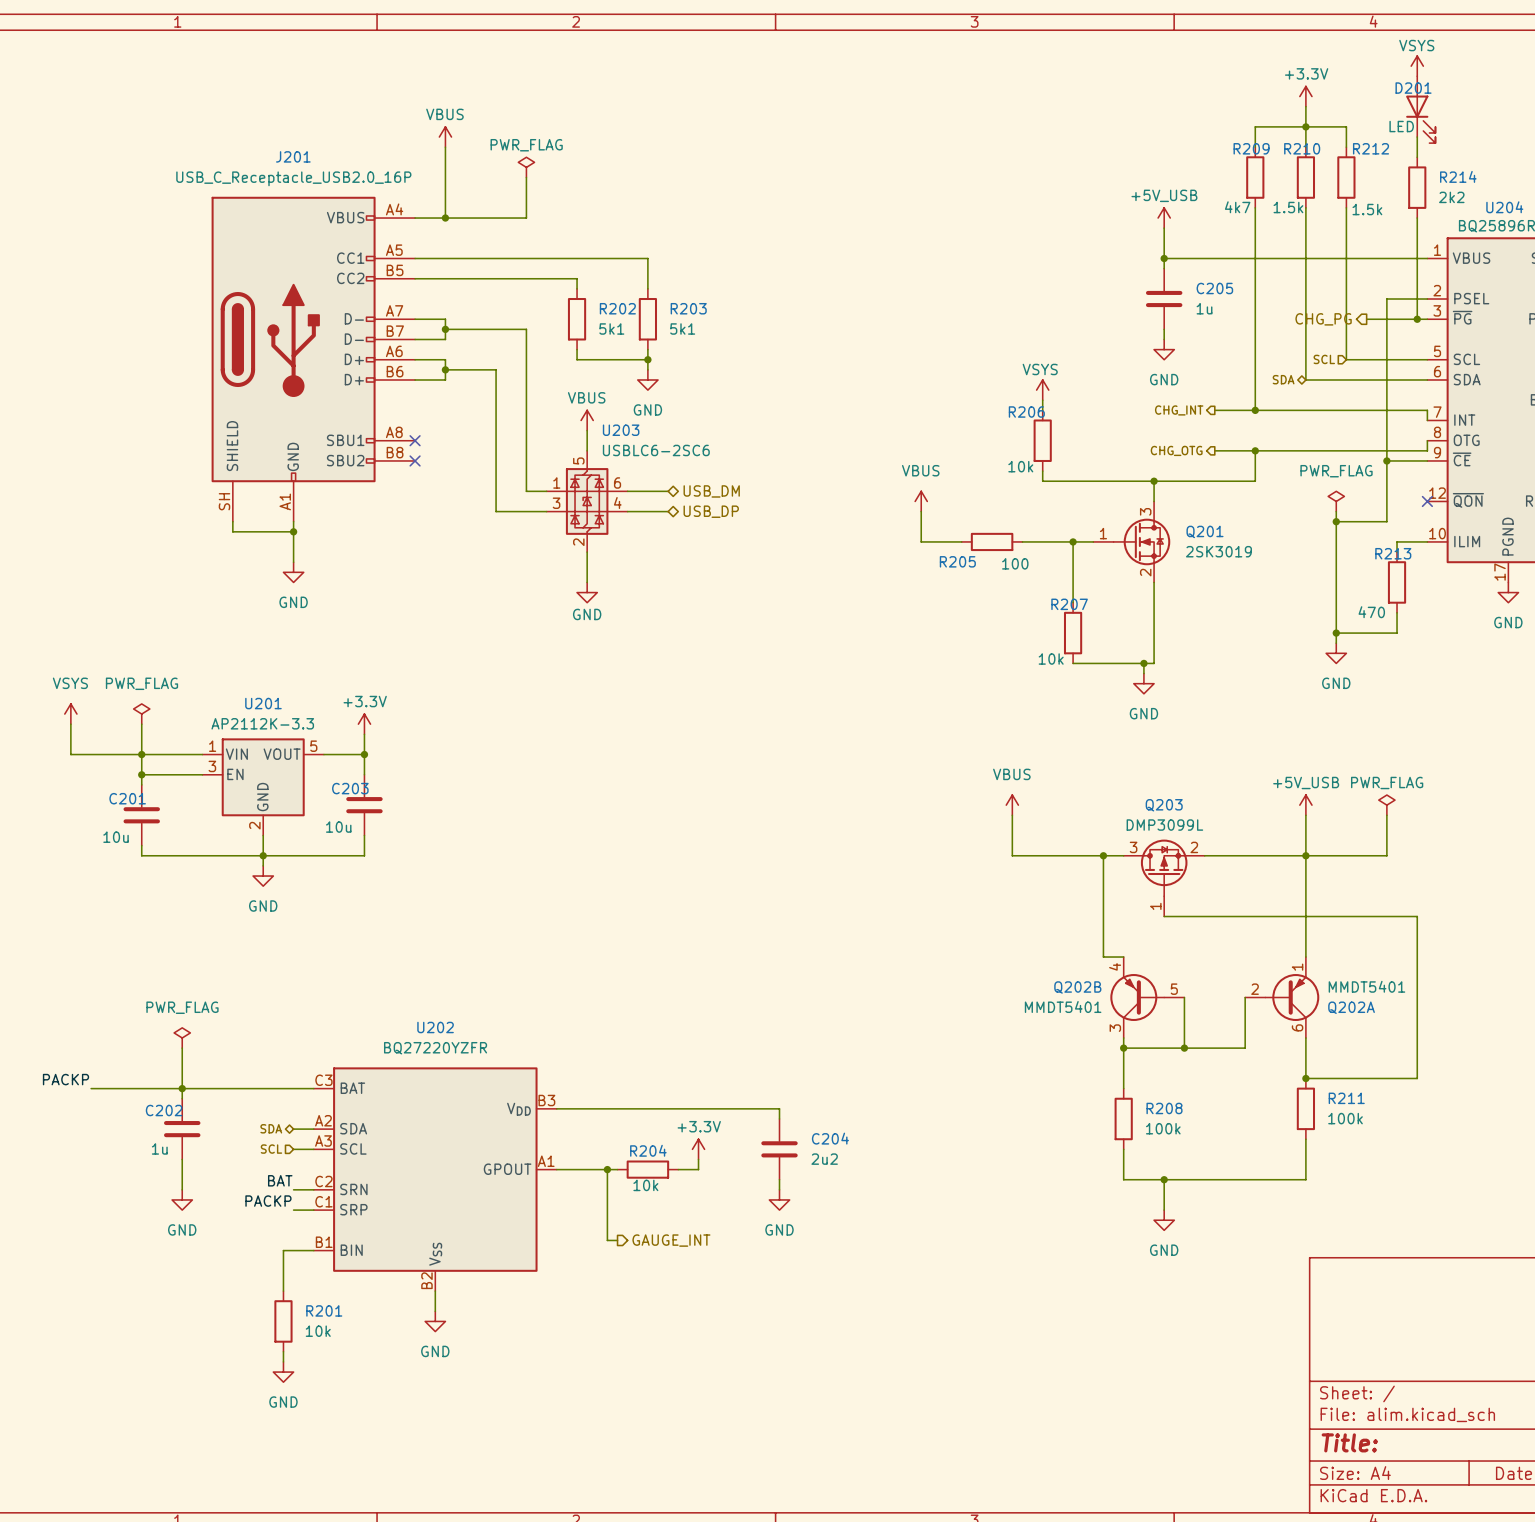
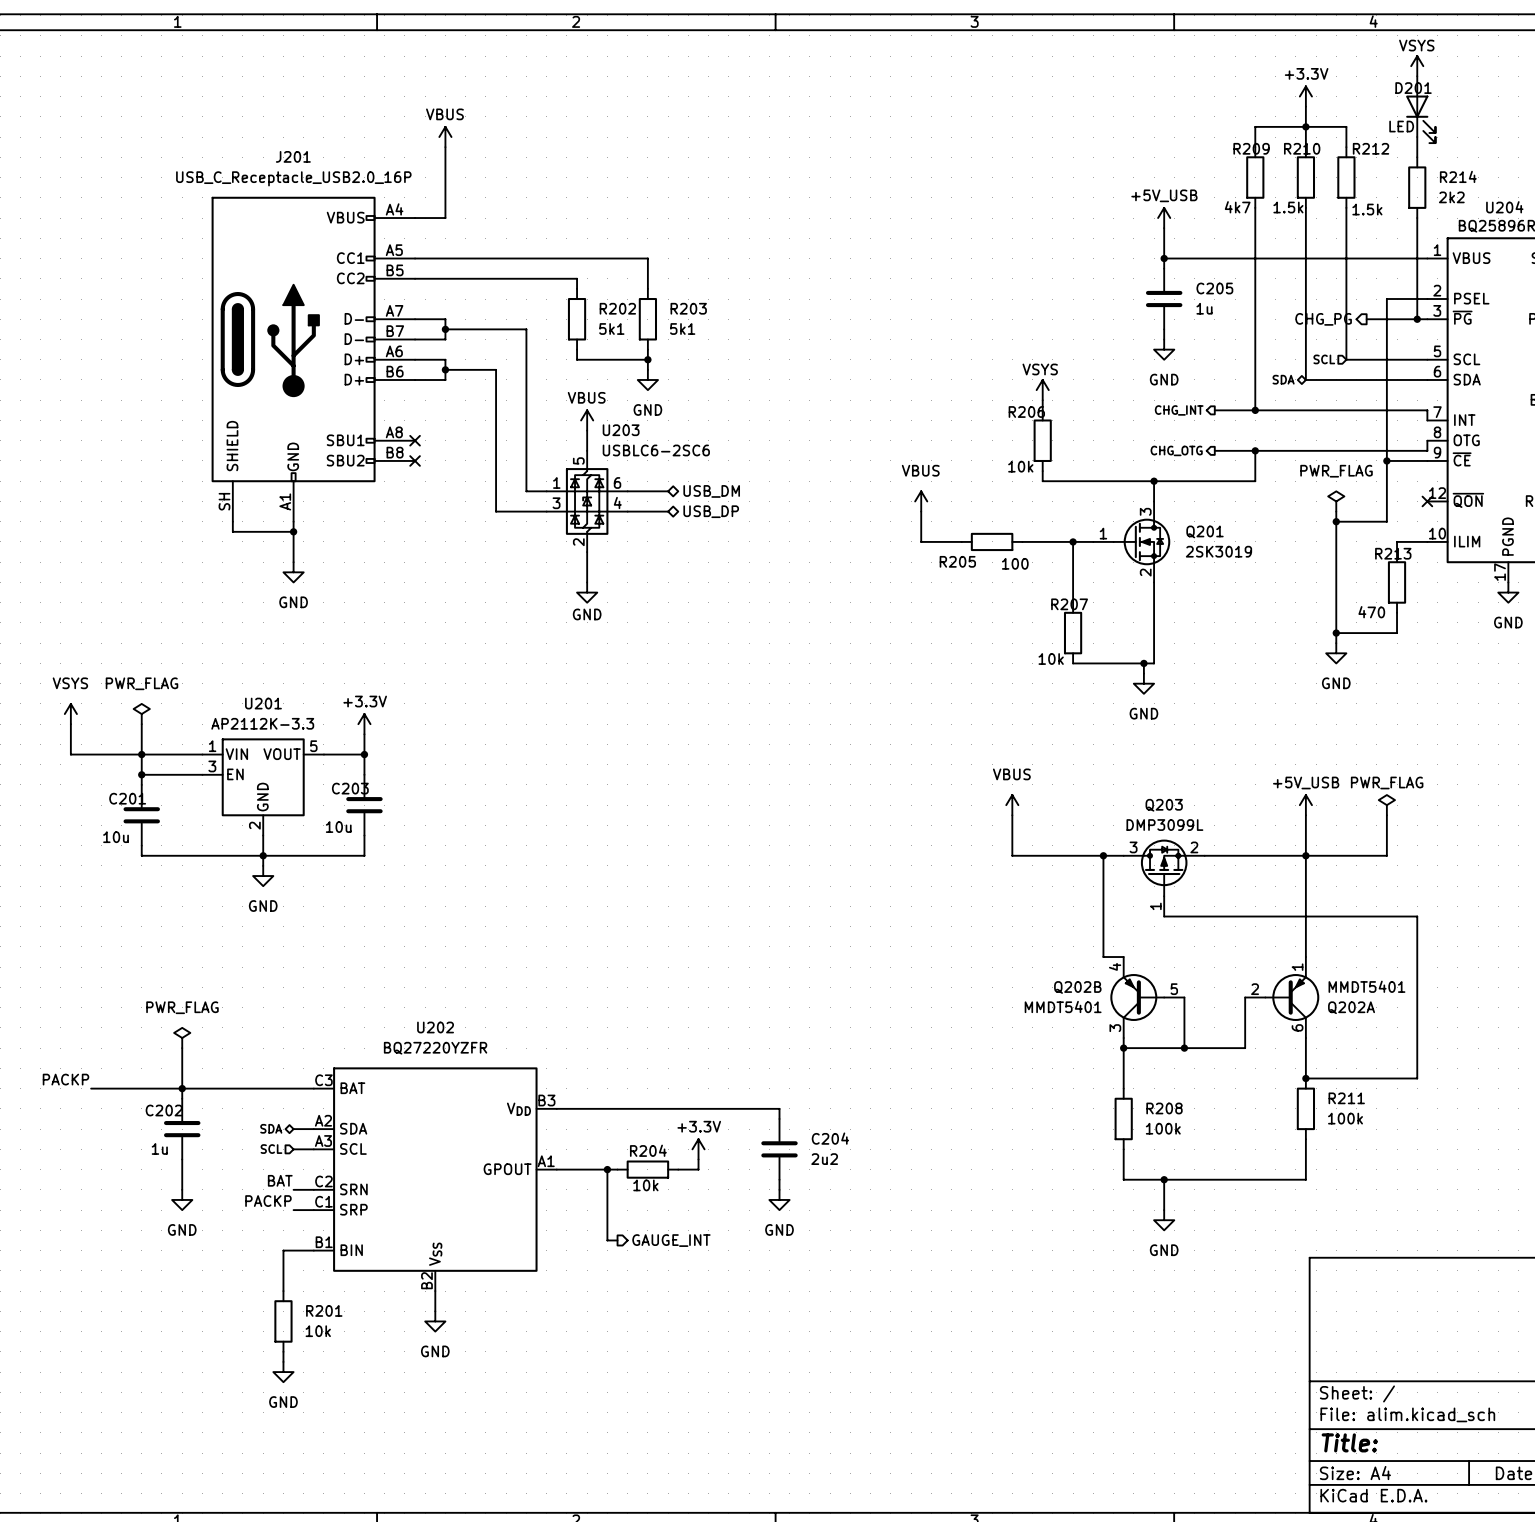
power symbol: PWR_FLAG (526, 167) -> none
wire: (526, 177) (526, 218) (445, 218) -> none
junction: (445, 218) -> none

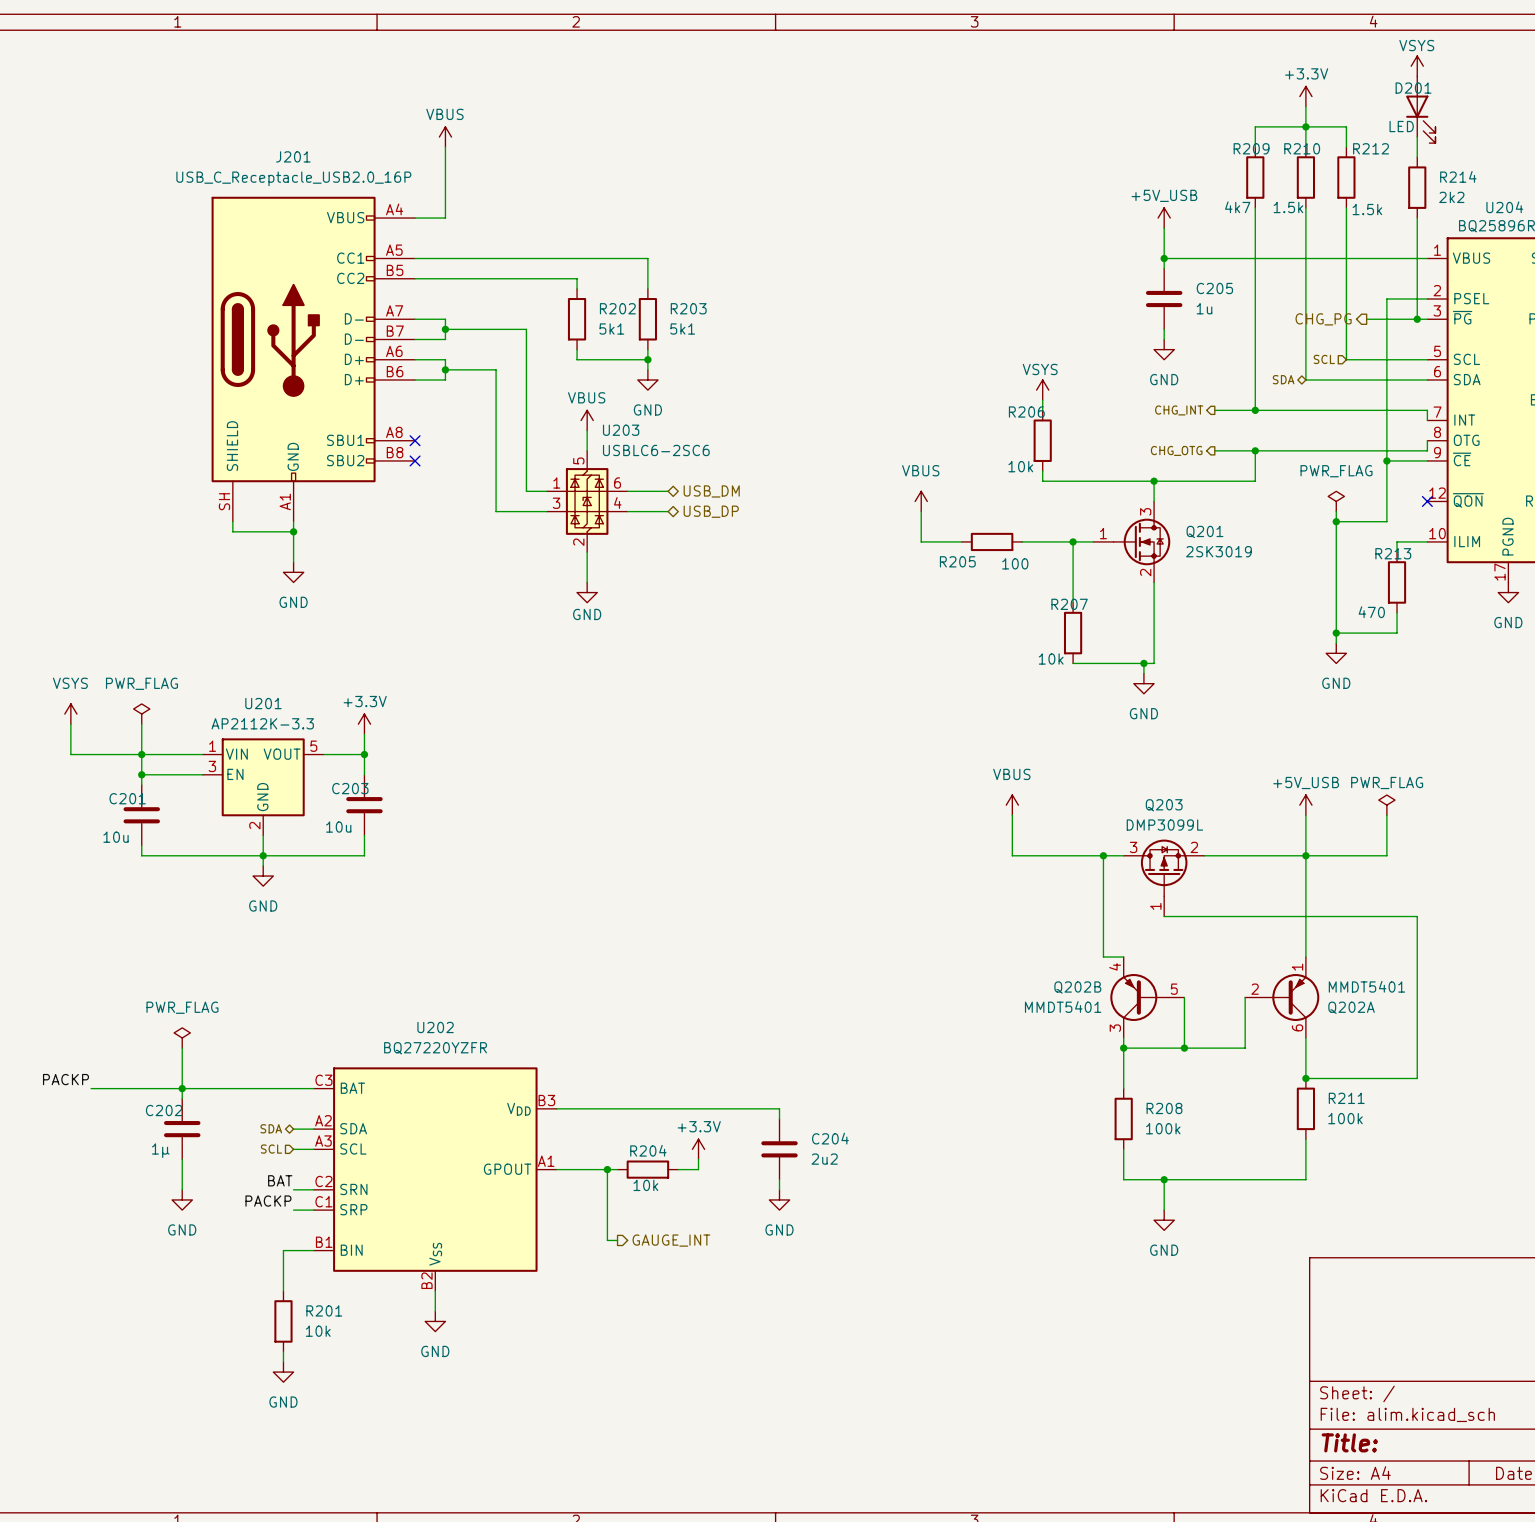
C202 value: 1u (159, 1148) -> 1µ (160, 1150)

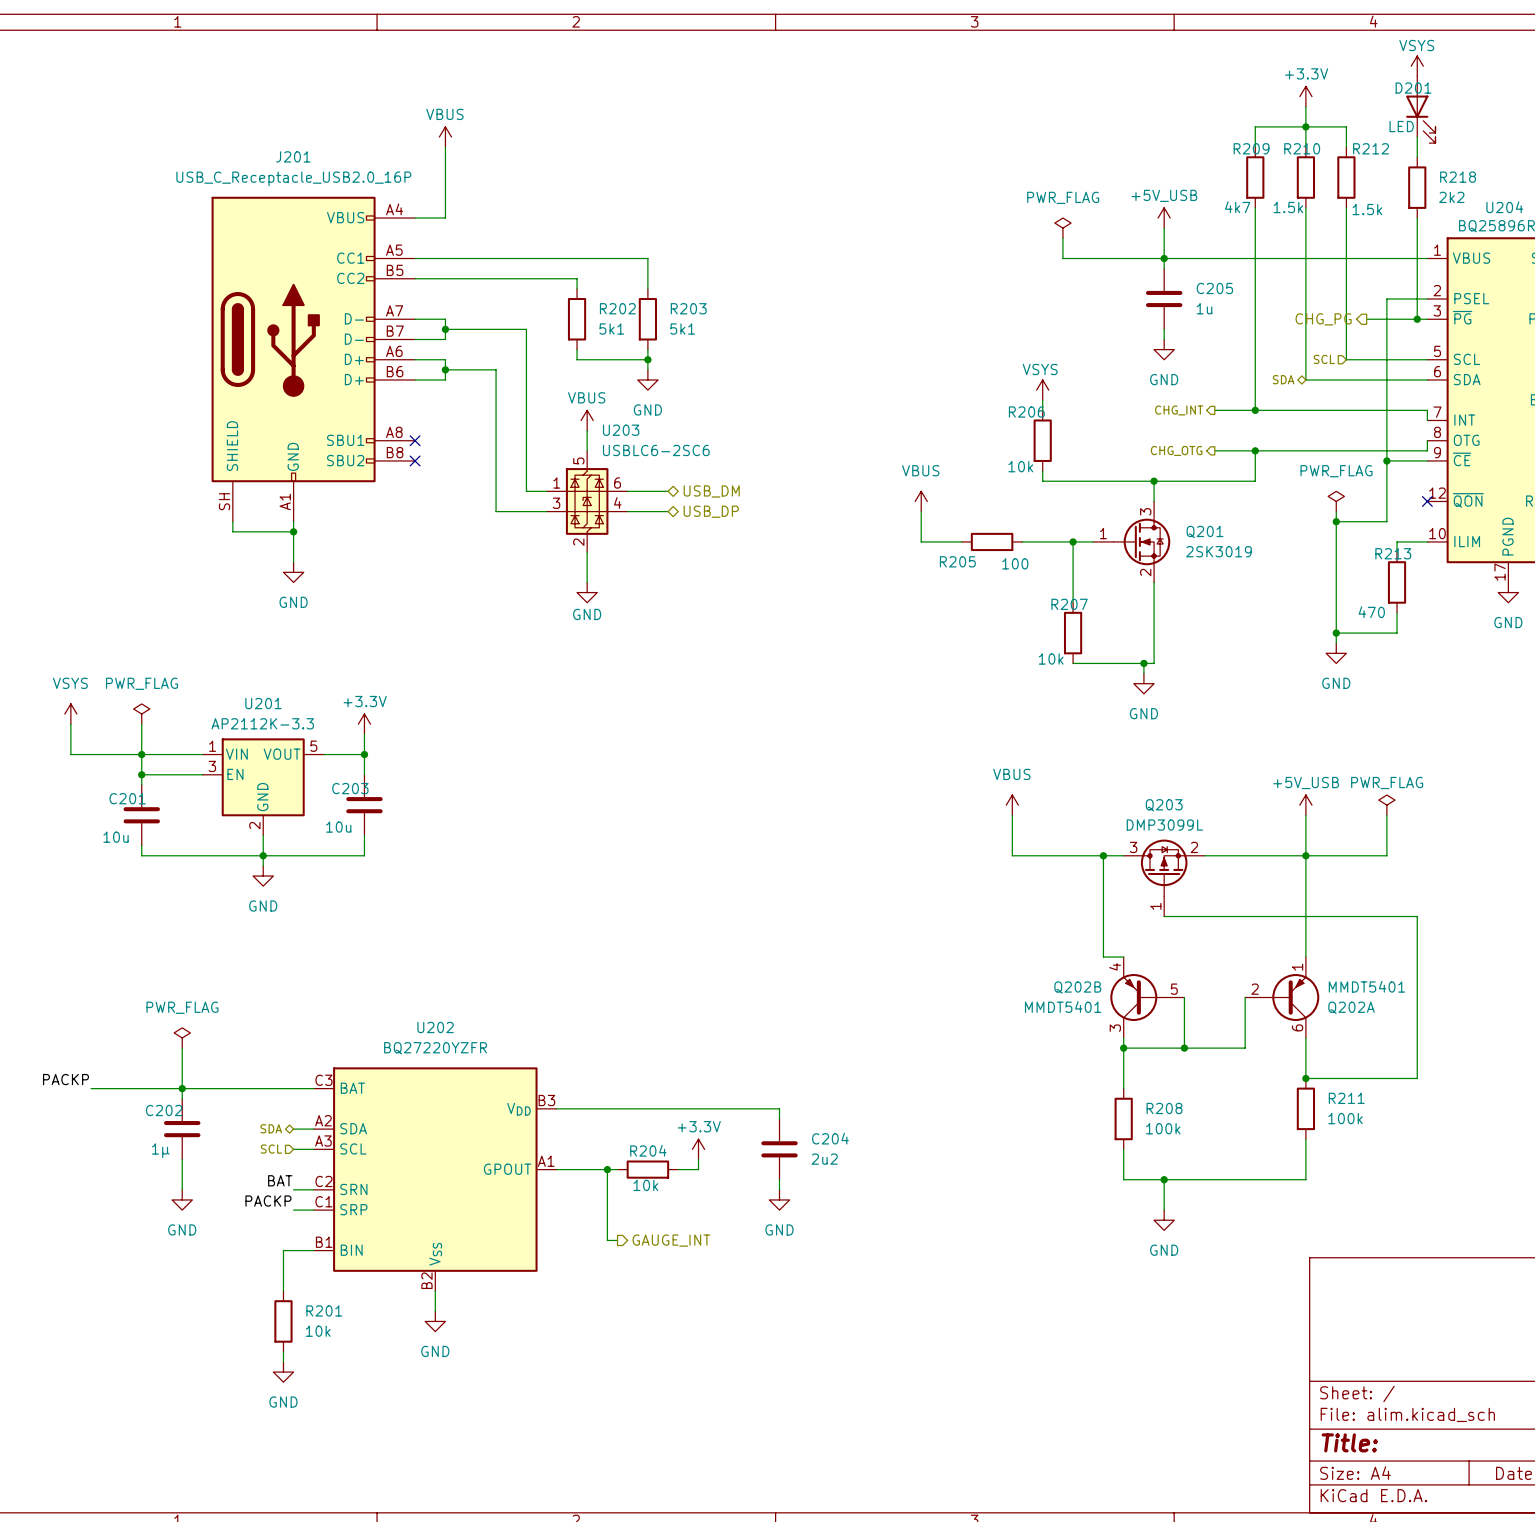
R214 name: R214 (1458, 176) -> R218 (1458, 177)
power symbol: none -> PWR_FLAG (1062, 228)
wire: none -> (1062, 238) (1062, 258) (1164, 258)

